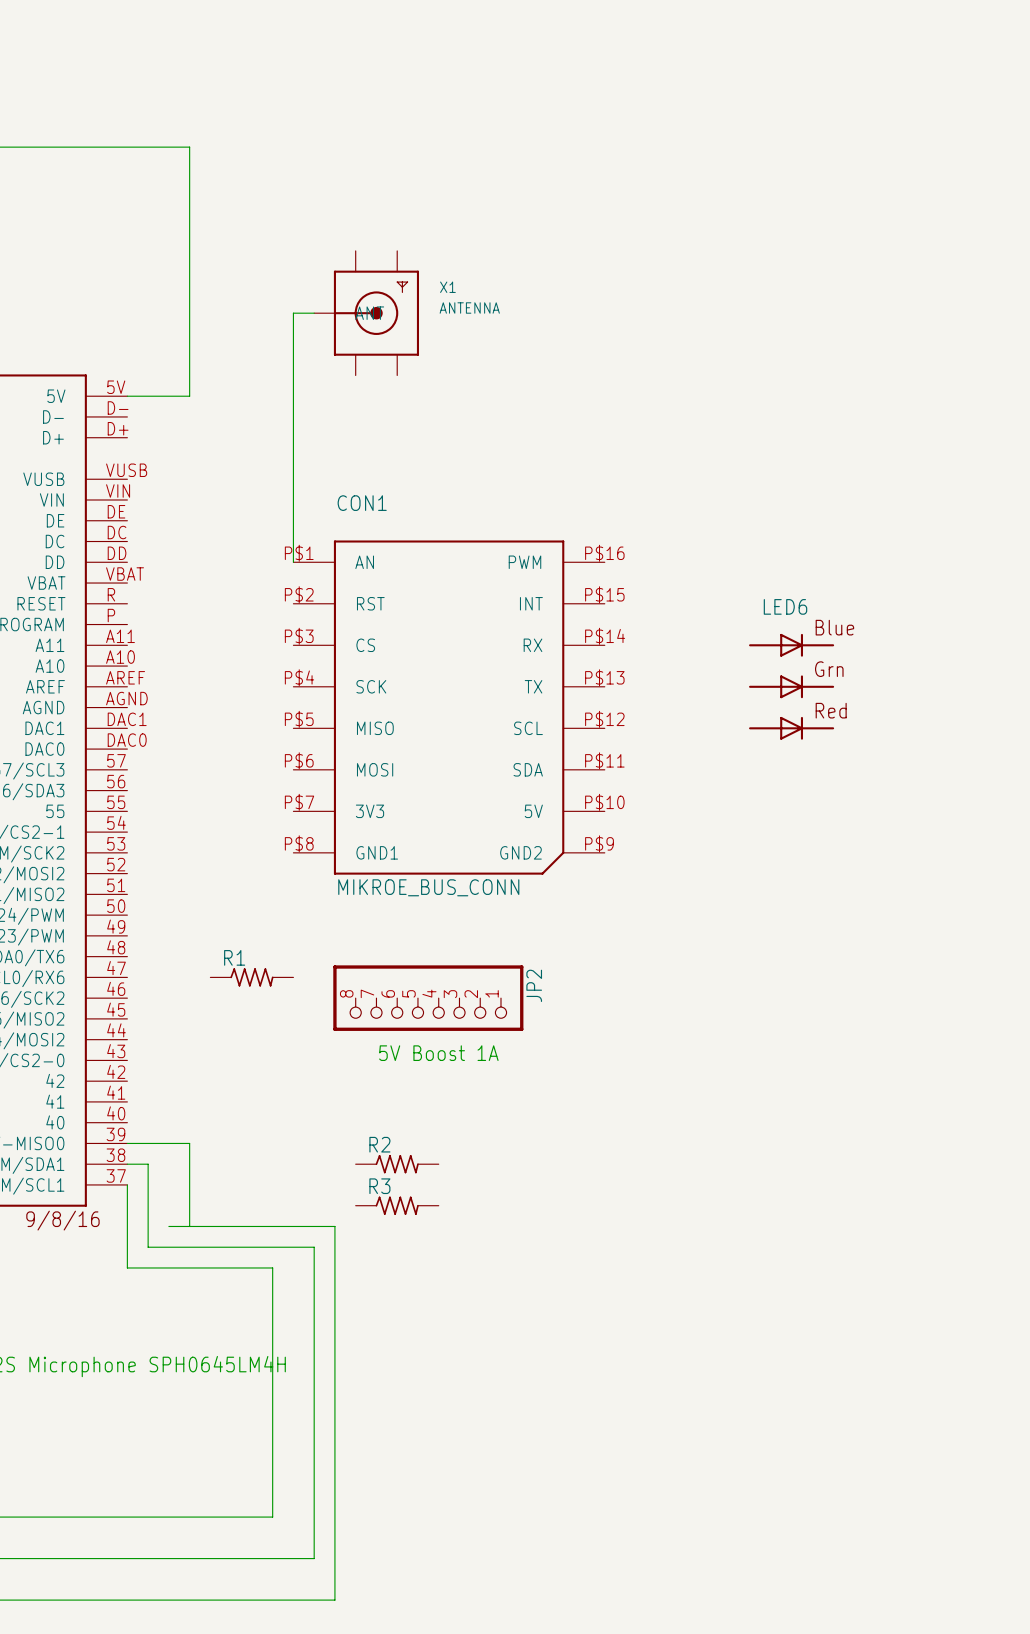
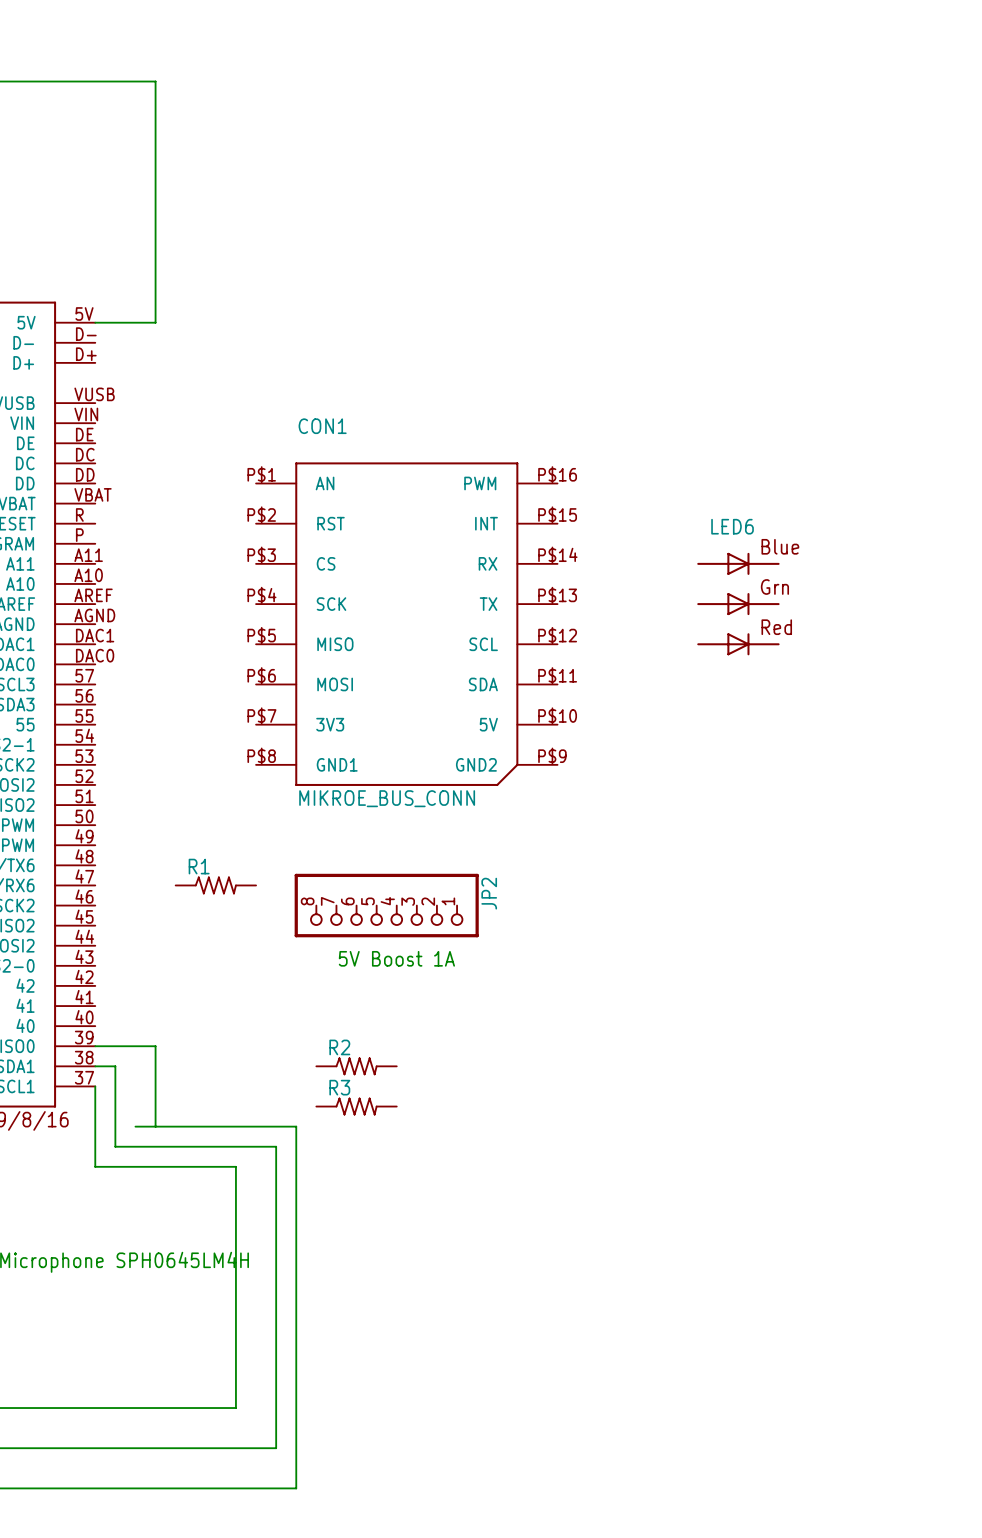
wire: (314, 313) (293, 313) (293, 562) -> none
X1: ANTENNA (366, 313) -> none

